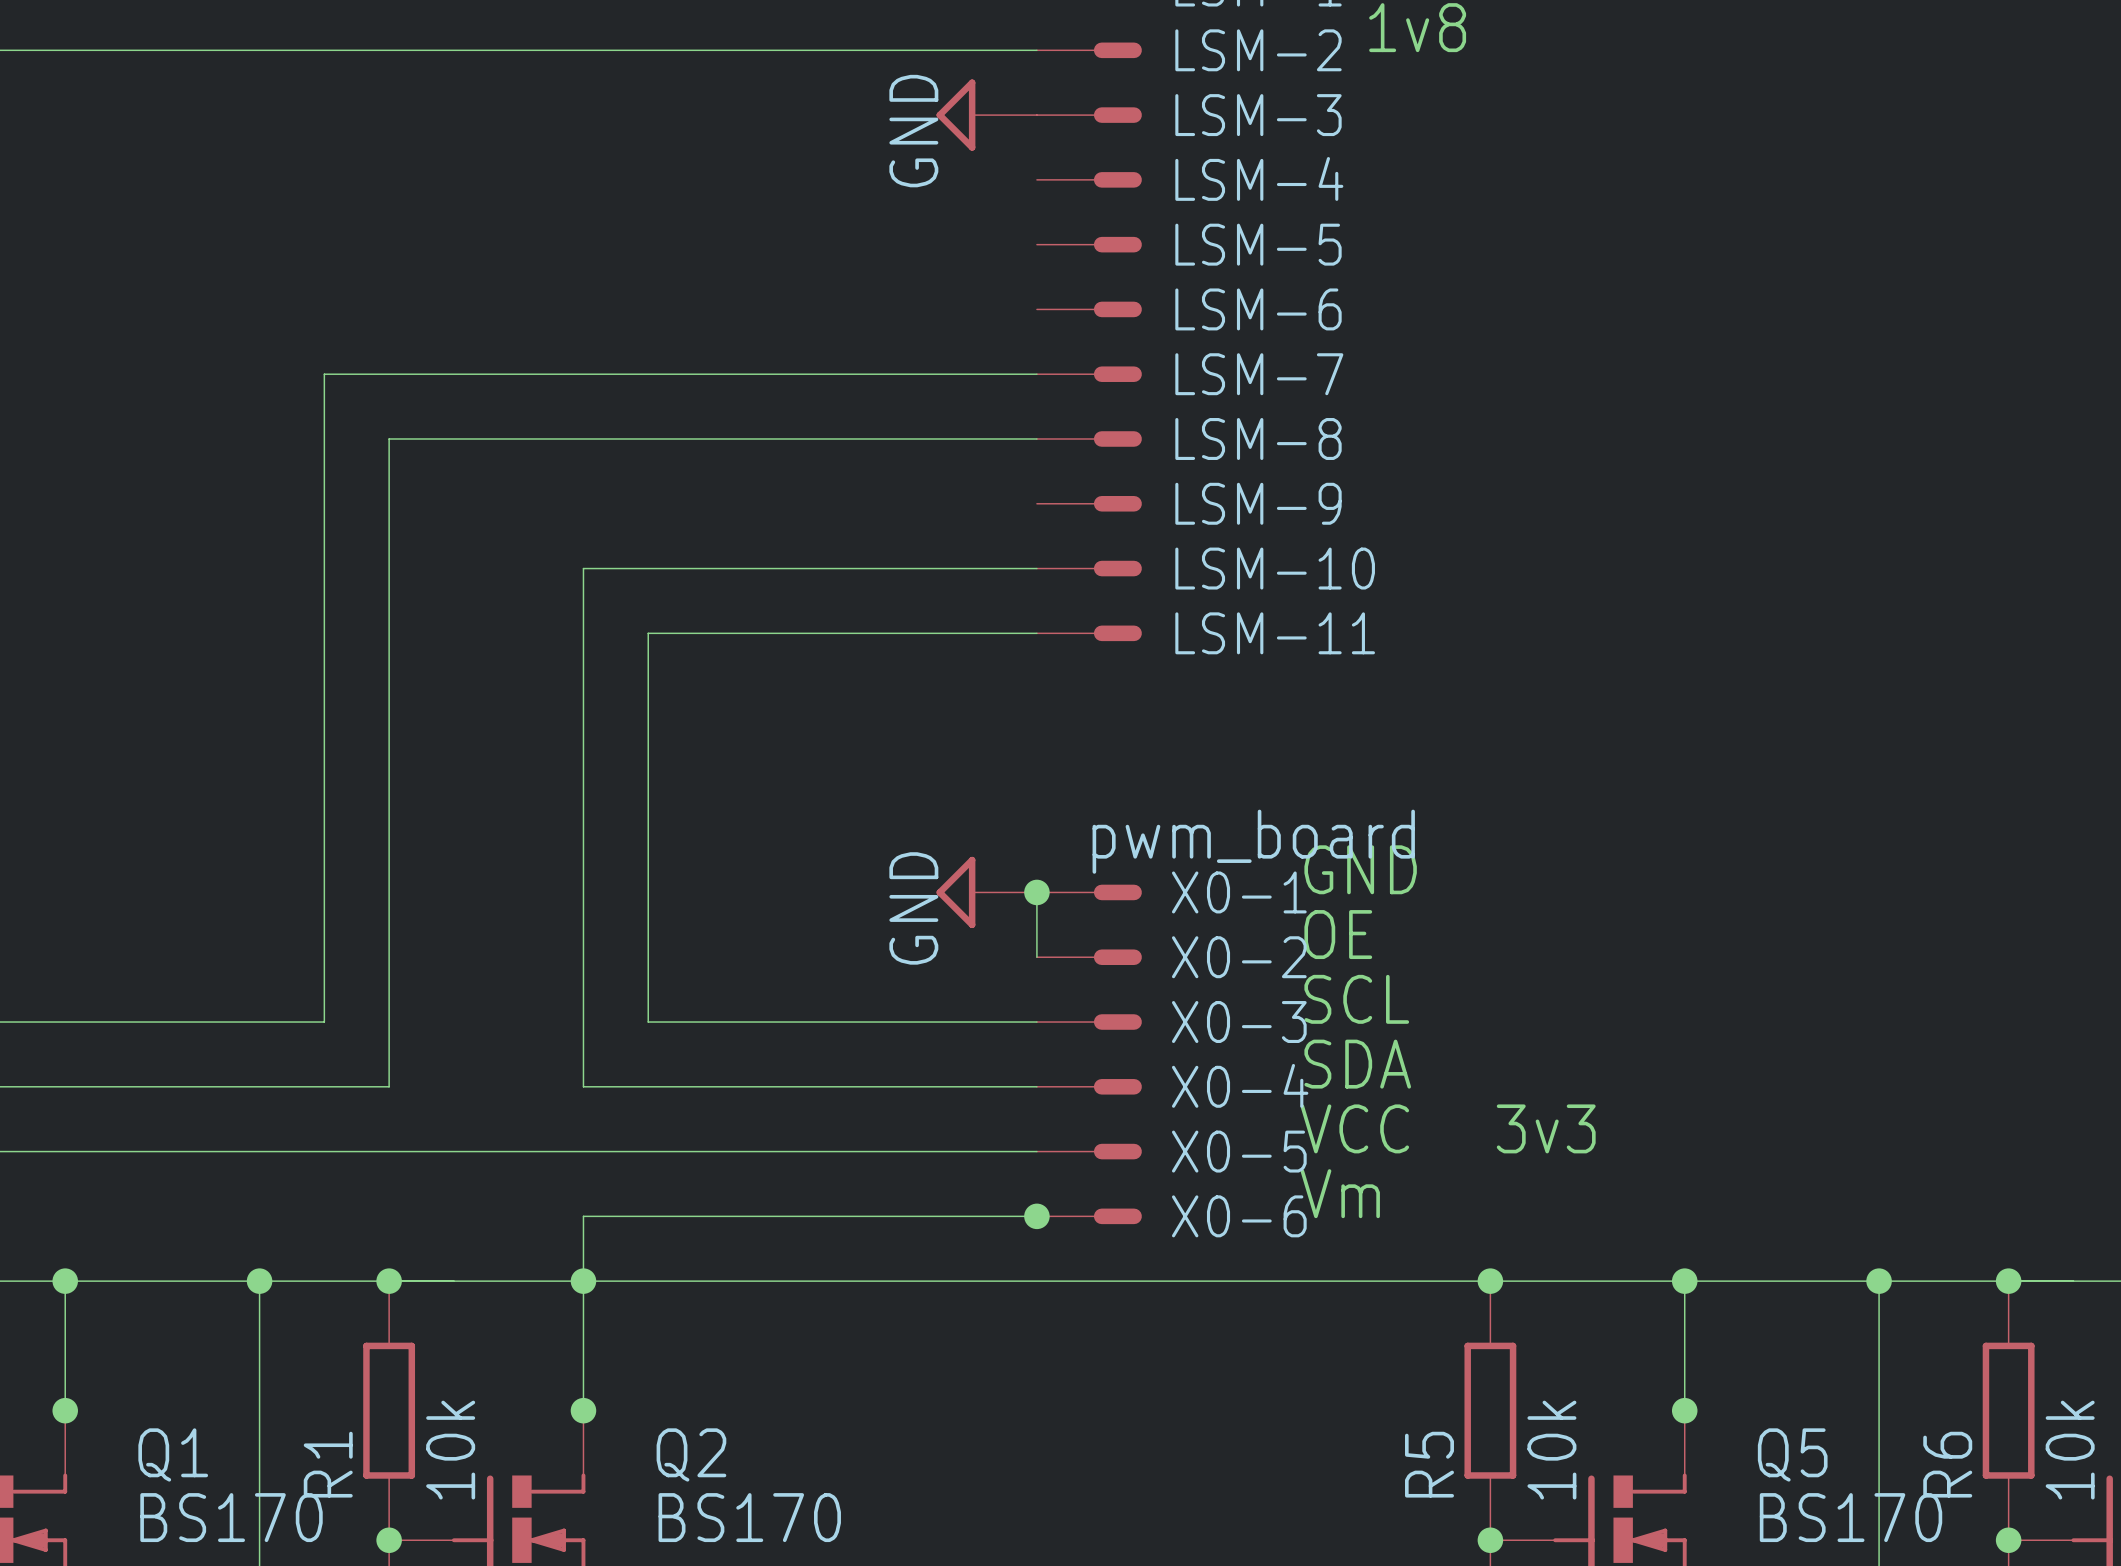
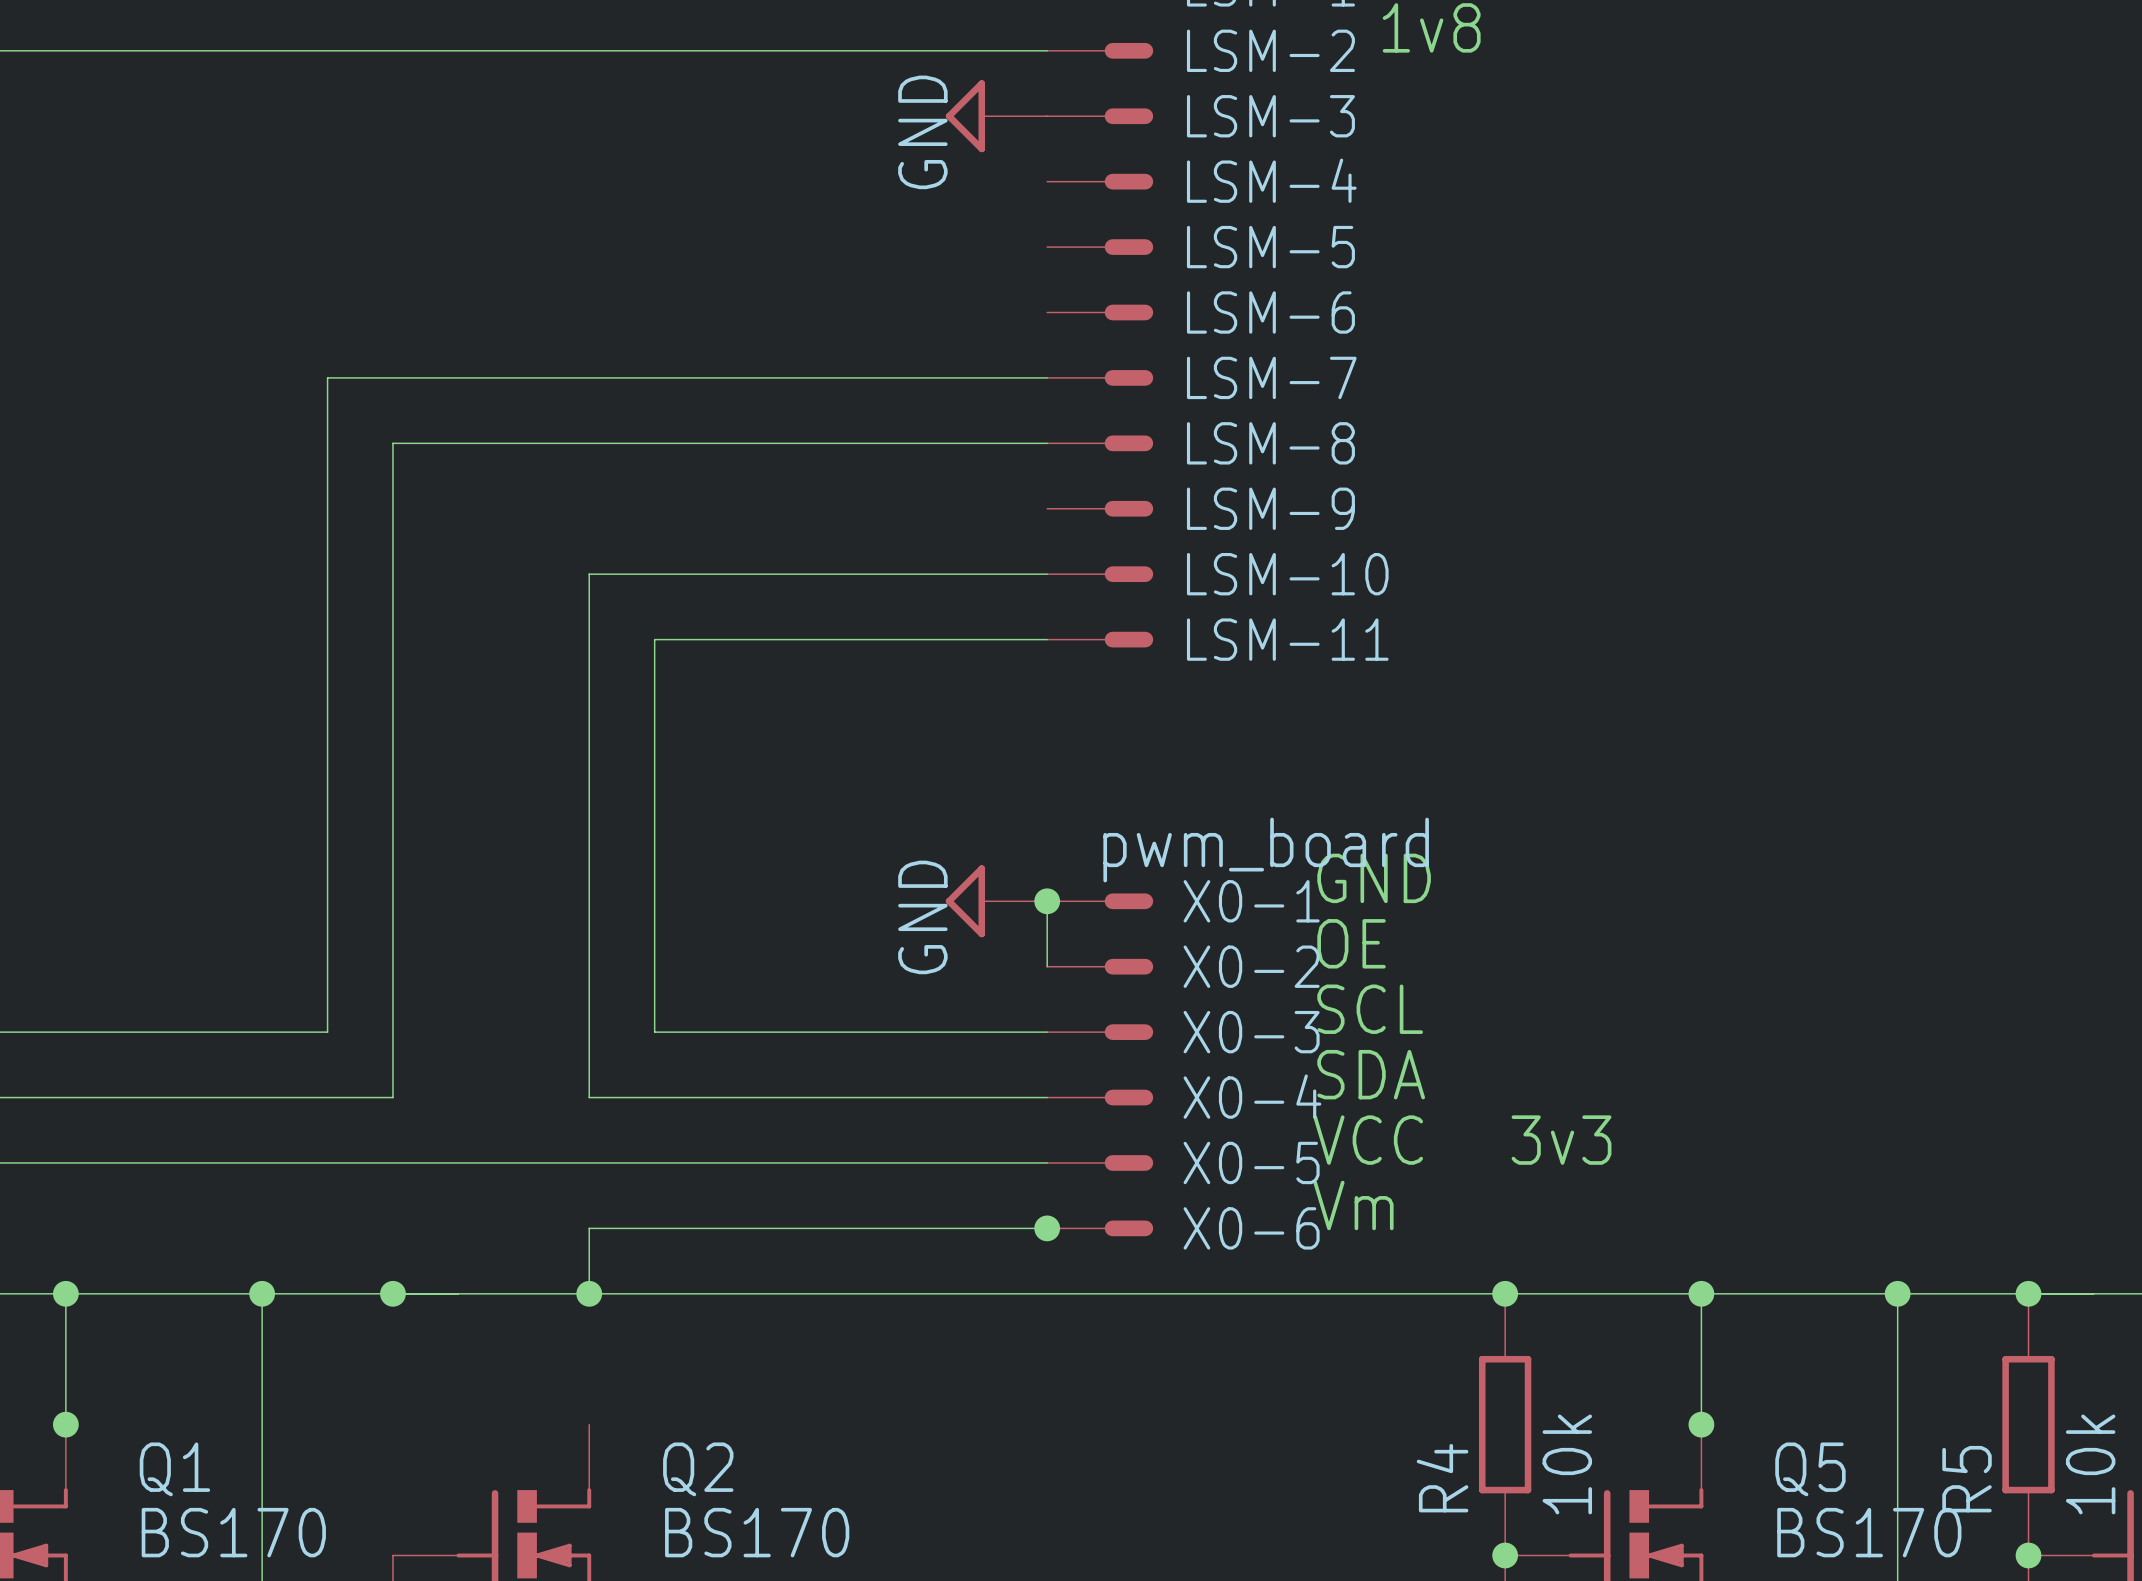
wire: (583, 1281) (583, 1410) -> none
R1: 10k (389, 1410) -> none
junction: (583, 1410) -> none
R5 name: R5 (1429, 1464) -> R4 (1442, 1478)
R6 name: R6 (1947, 1464) -> R5 (1967, 1479)
junction: (389, 1540) -> none

